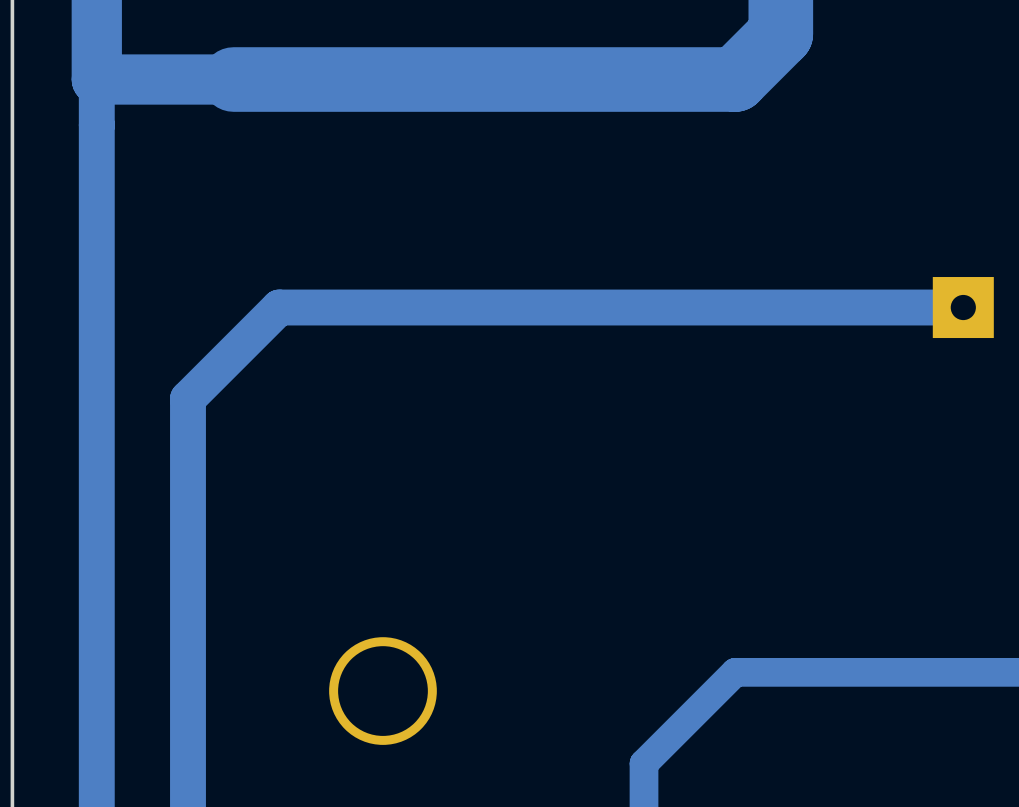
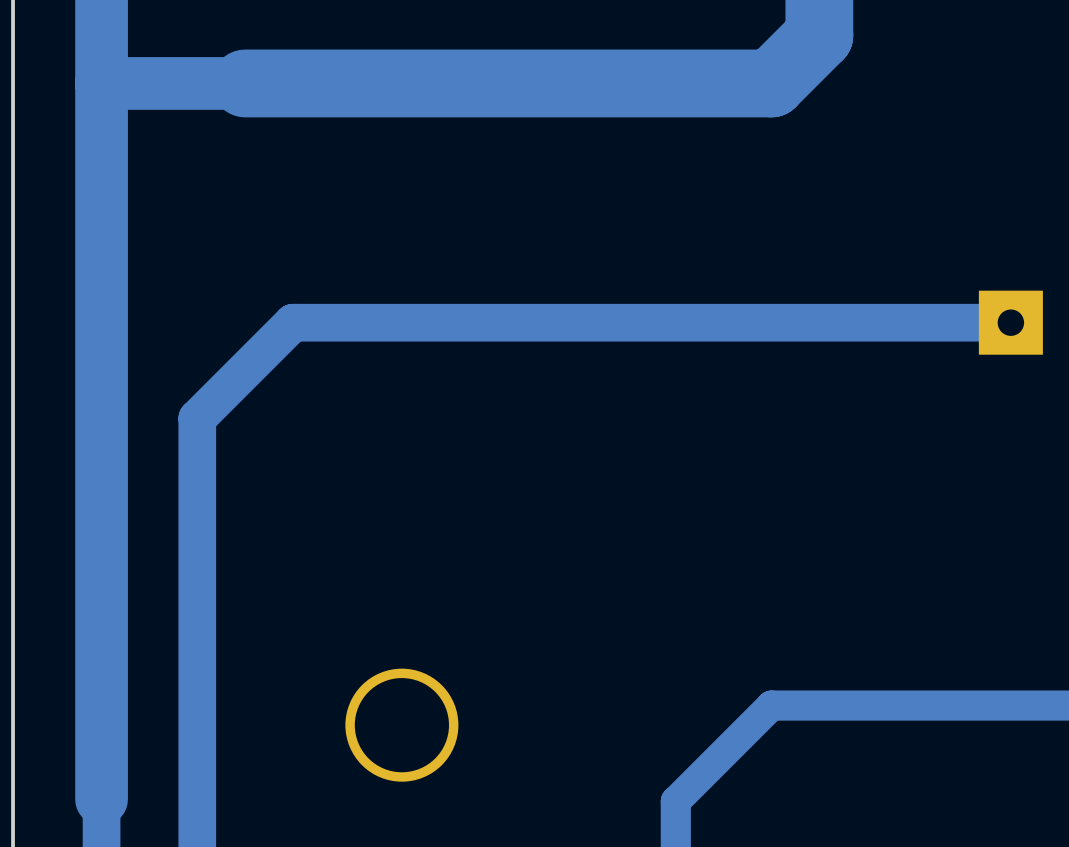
track width: thin (96, 79) (96, 761) -> thick (101, 83) (101, 799)

